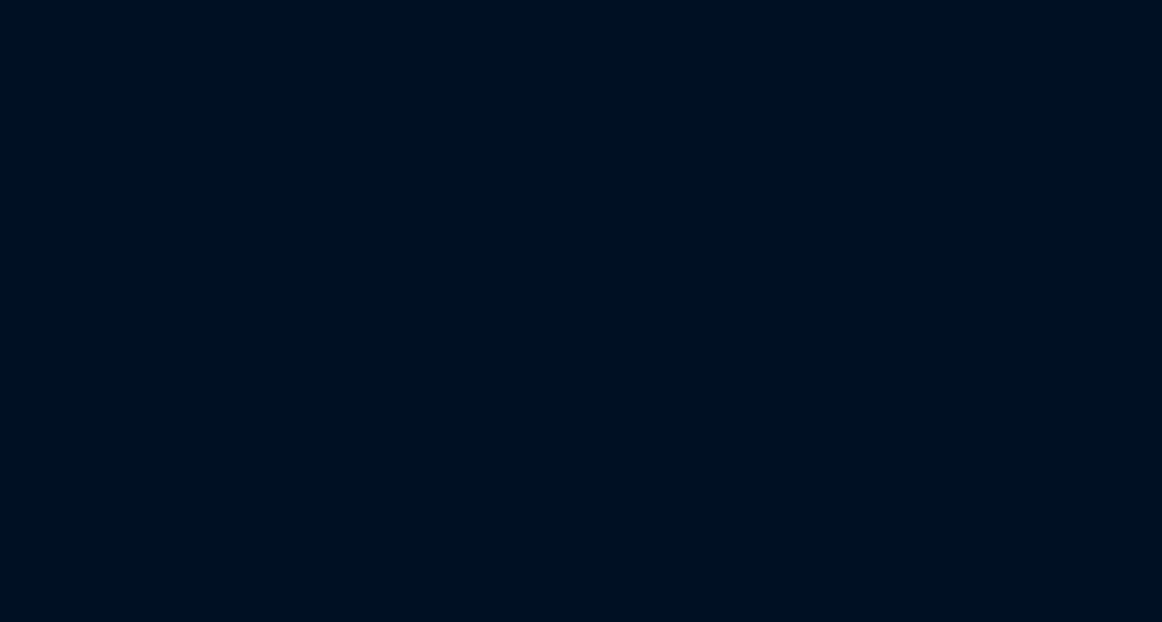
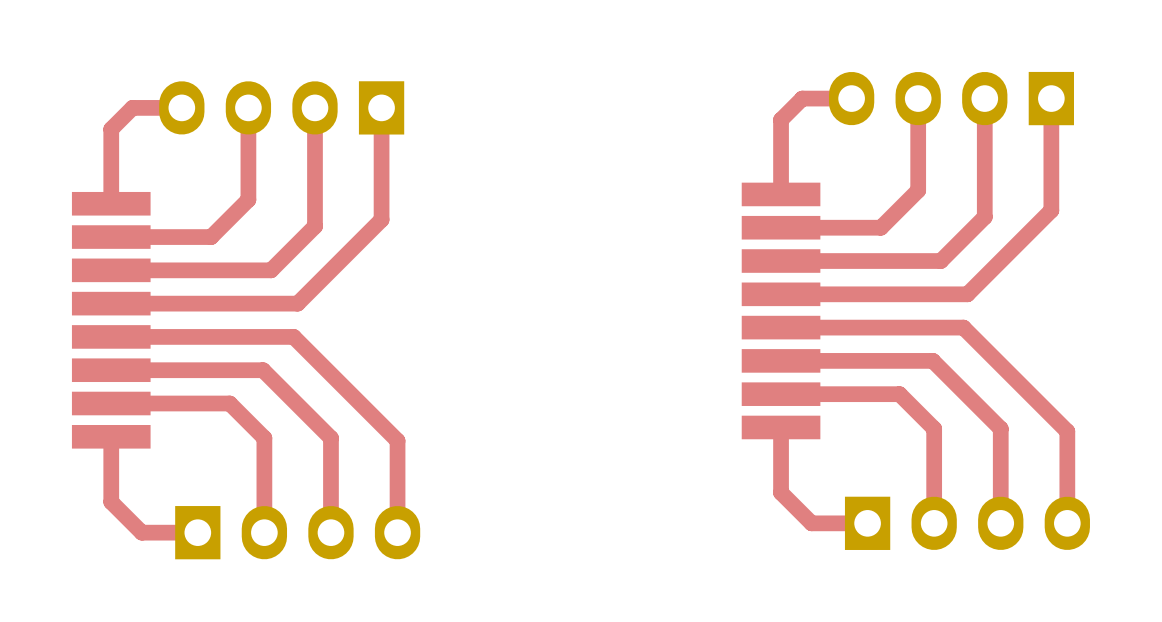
top track: none -> (851, 98) (802, 98) (781, 119) (781, 194)
top track: none -> (918, 98) (918, 190) (880, 227) (781, 227)
part: none -> (951, 98)
top track: none -> (984, 98) (984, 217) (940, 261) (781, 261)
top track: none -> (1051, 98) (1051, 210) (967, 294) (781, 294)
top track: none -> (181, 107) (132, 107) (111, 129) (111, 203)
top track: none -> (248, 107) (248, 199) (211, 237) (111, 237)
part: none -> (281, 107)
top track: none -> (314, 107) (314, 226) (271, 270) (111, 270)
top track: none -> (381, 107) (381, 219) (297, 303) (111, 303)
part: none -> (781, 310)
part: none -> (111, 320)
top track: none -> (781, 327) (963, 327) (1067, 431) (1067, 523)
top track: none -> (111, 336) (293, 336) (397, 440) (397, 532)
top track: none -> (781, 360) (932, 360) (1000, 428) (1000, 523)
top track: none -> (111, 370) (263, 370) (330, 438) (330, 532)
top track: none -> (781, 394) (899, 394) (934, 428) (934, 523)
top track: none -> (111, 403) (229, 403) (264, 438) (264, 532)
top track: none -> (781, 427) (781, 492) (811, 523) (867, 523)
top track: none -> (111, 436) (111, 502) (141, 532) (197, 532)
part: none -> (967, 523)
part: none -> (297, 532)

